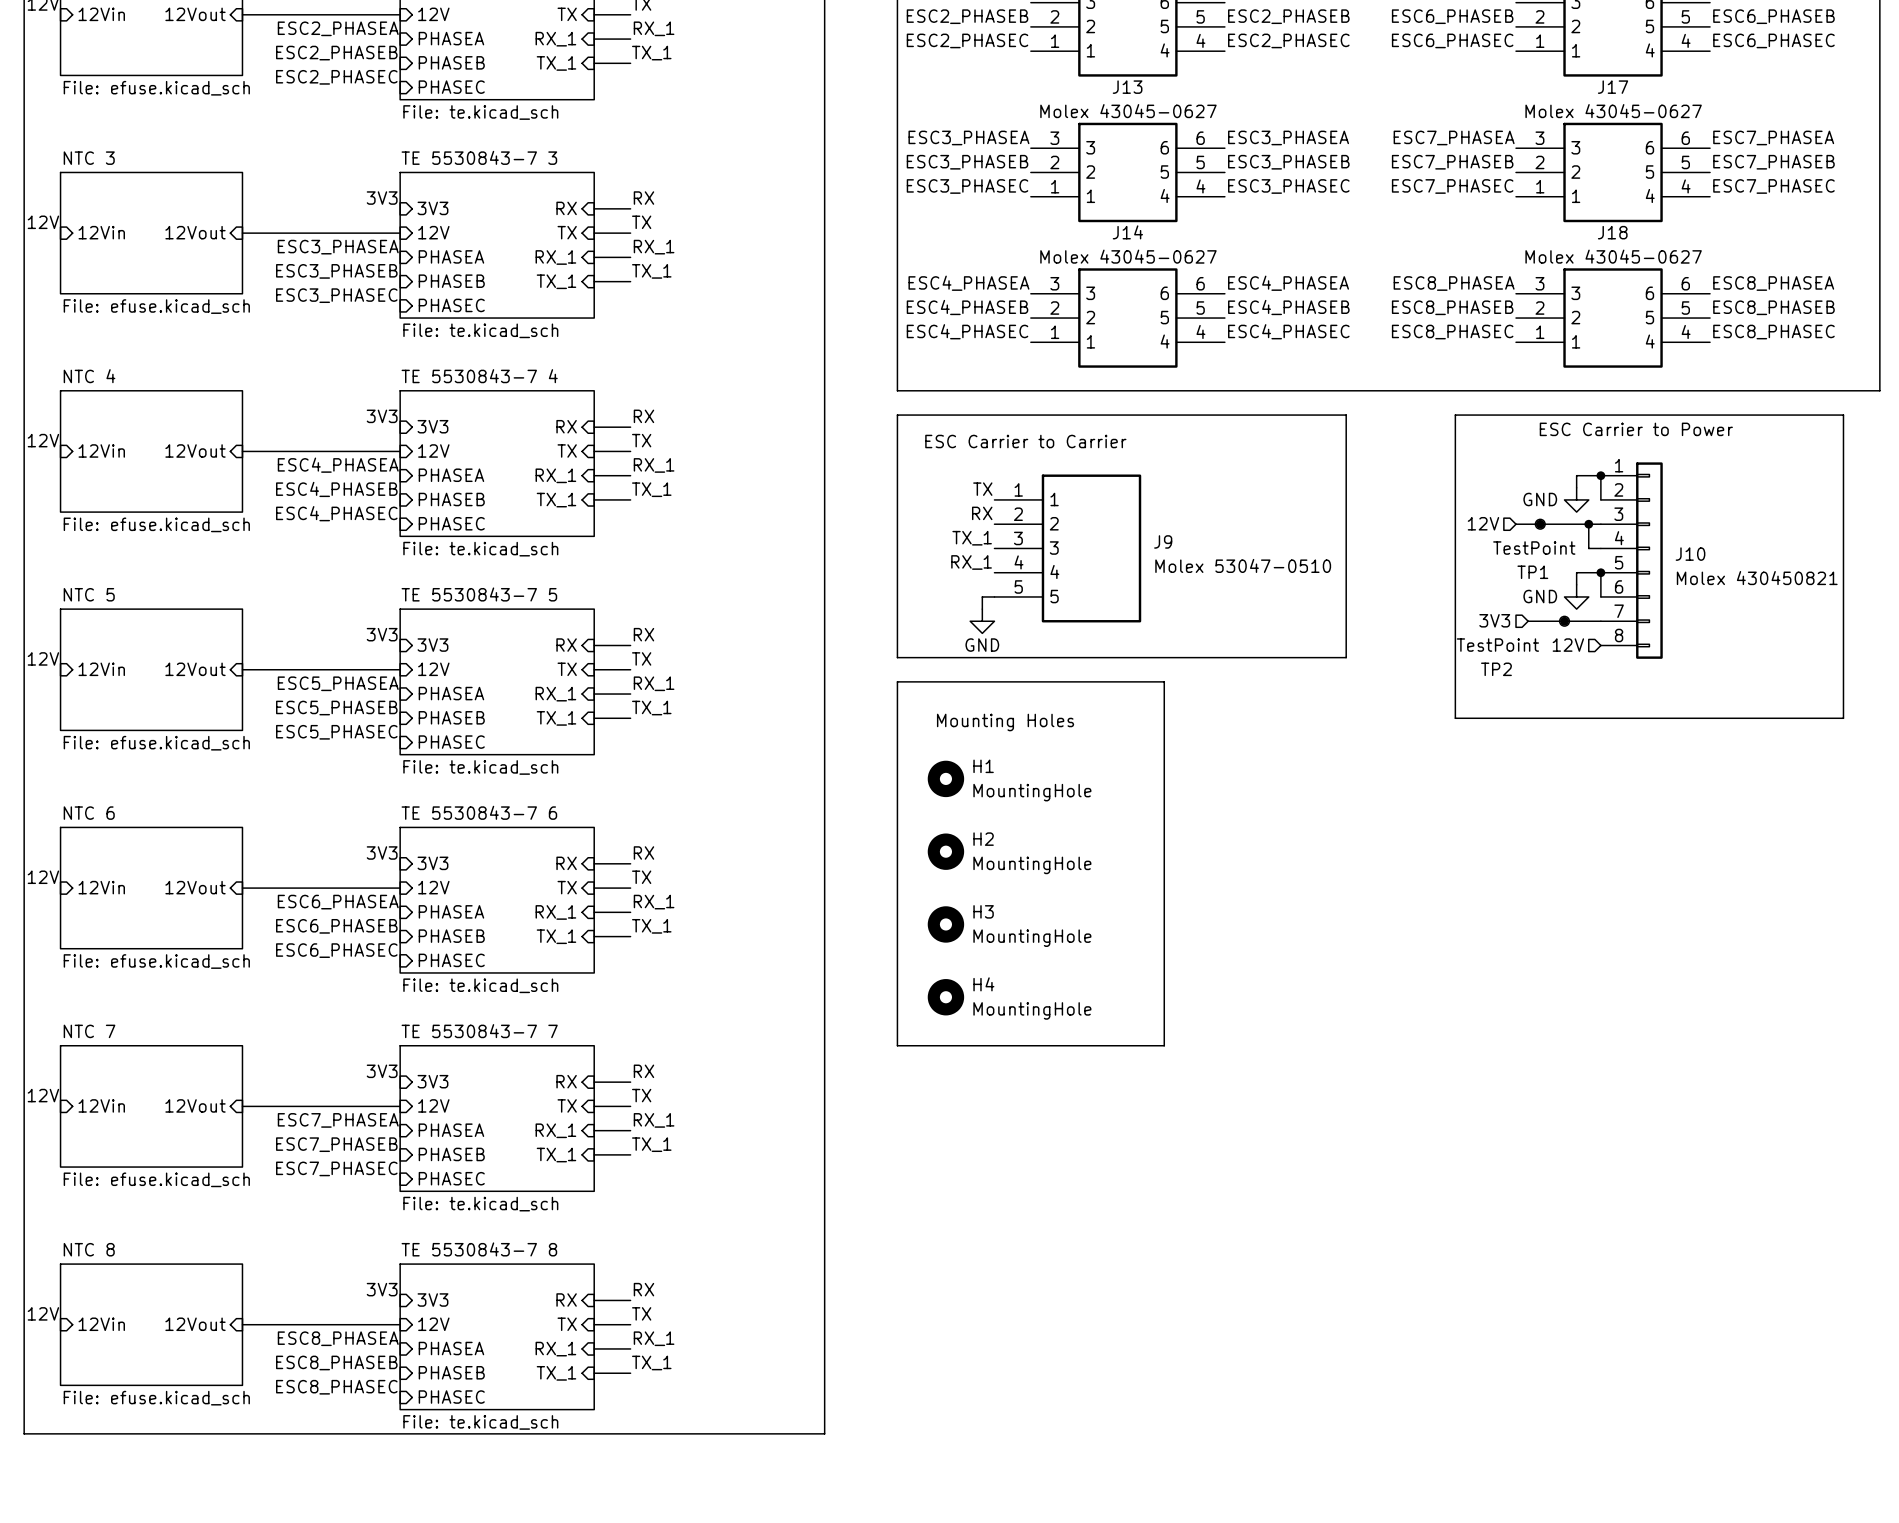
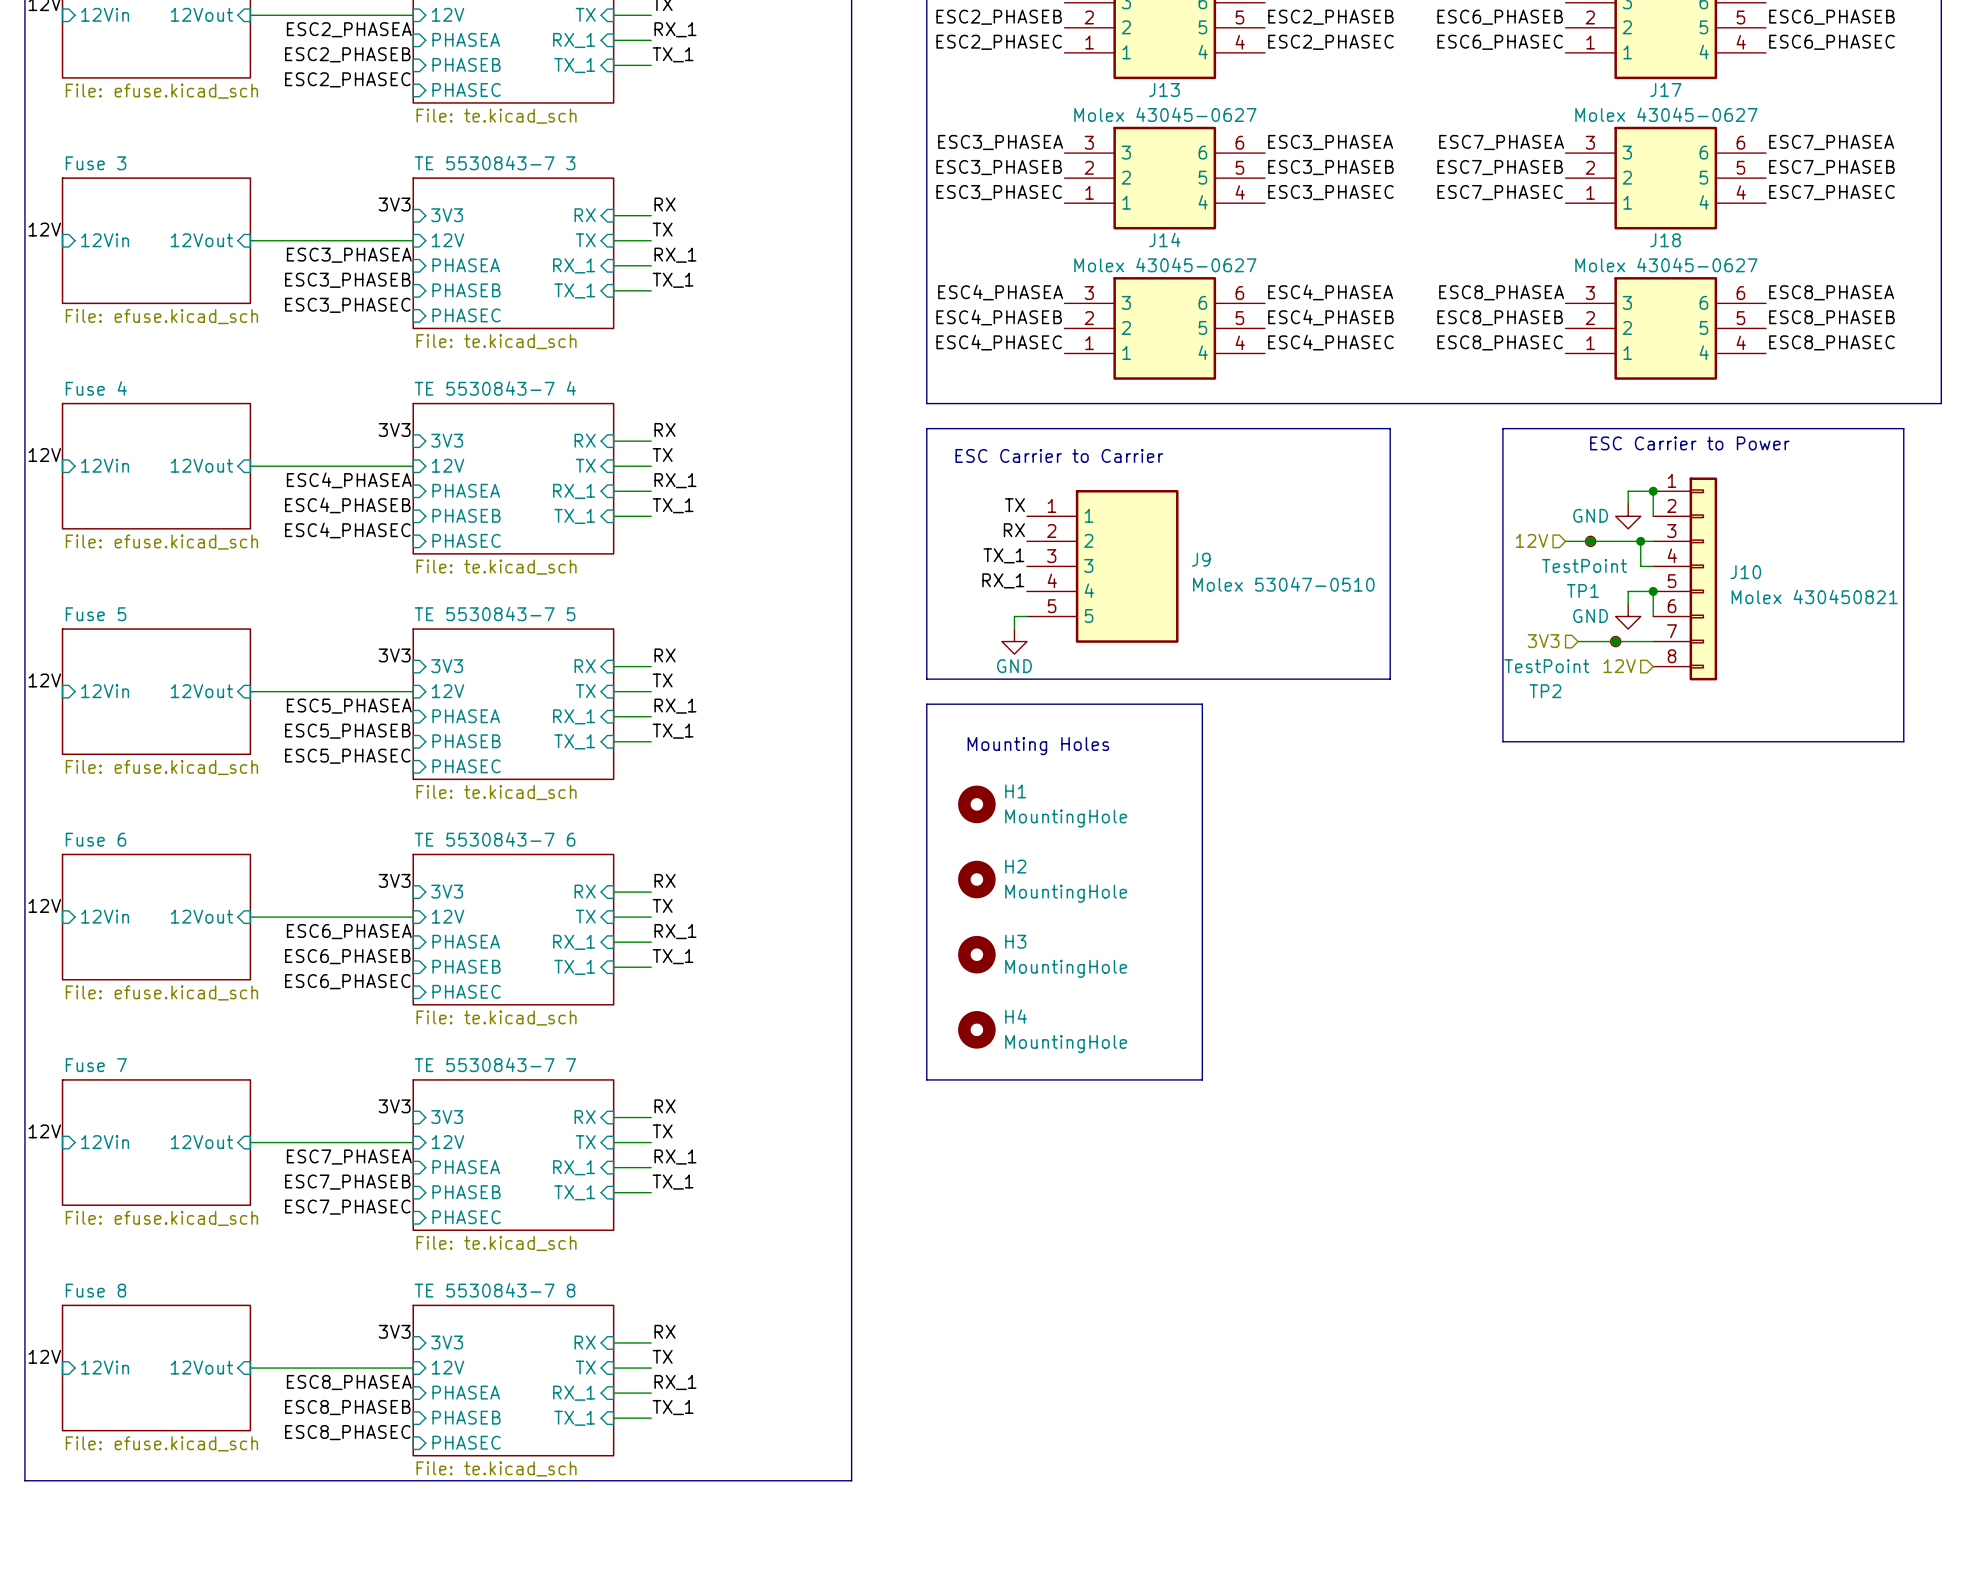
sheet NTC 3 name: NTC 3 (89, 158) -> Fuse 3 (96, 163)
sheet NTC 4 name: NTC 4 (89, 376) -> Fuse 4 (96, 388)
sheet NTC 5 name: NTC 5 (89, 594) -> Fuse 5 (96, 614)
sheet NTC 6 name: NTC 6 (89, 813) -> Fuse 6 (96, 839)
sheet NTC 7 name: NTC 7 (89, 1031) -> Fuse 7 (96, 1065)
sheet NTC 8 name: NTC 8 (89, 1249) -> Fuse 8 (96, 1290)

